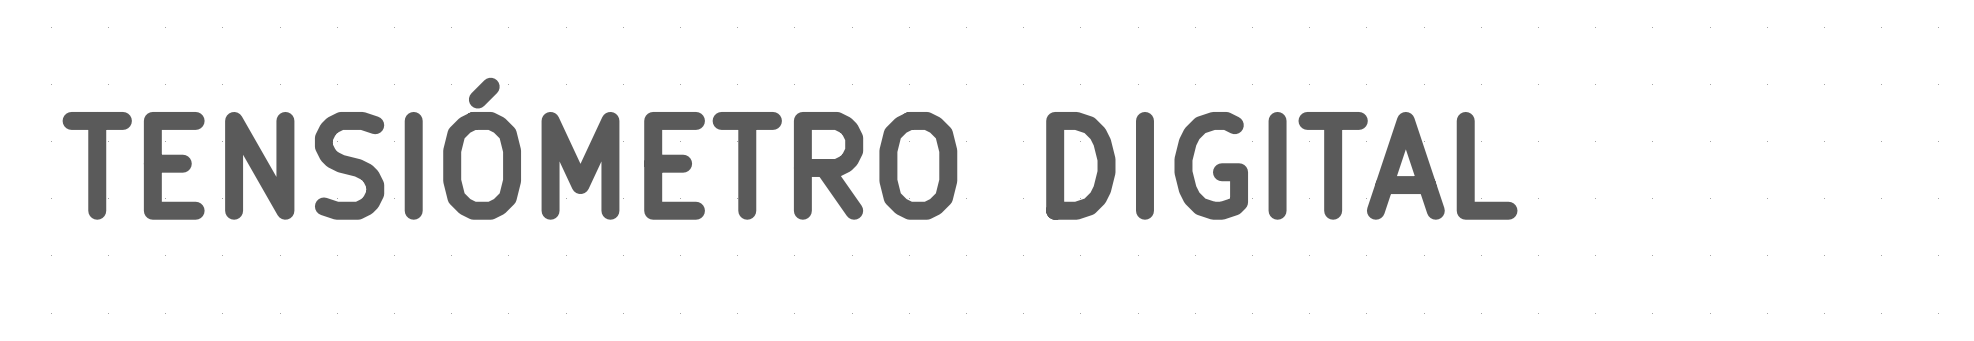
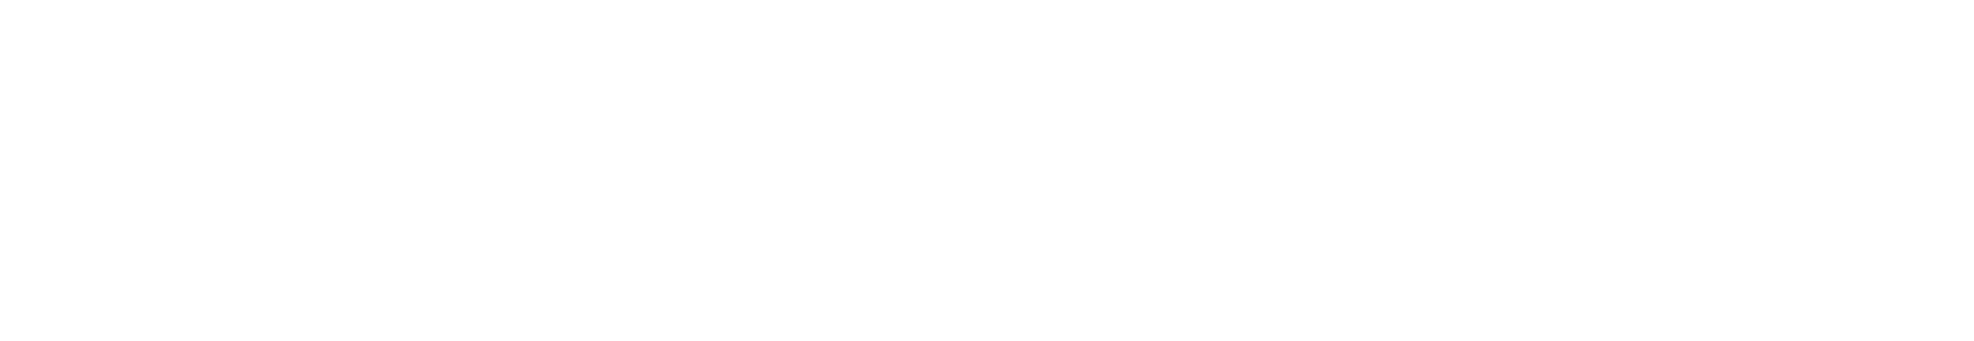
text: TENSIÓMETRO DIGITAL (790, 148) -> none

